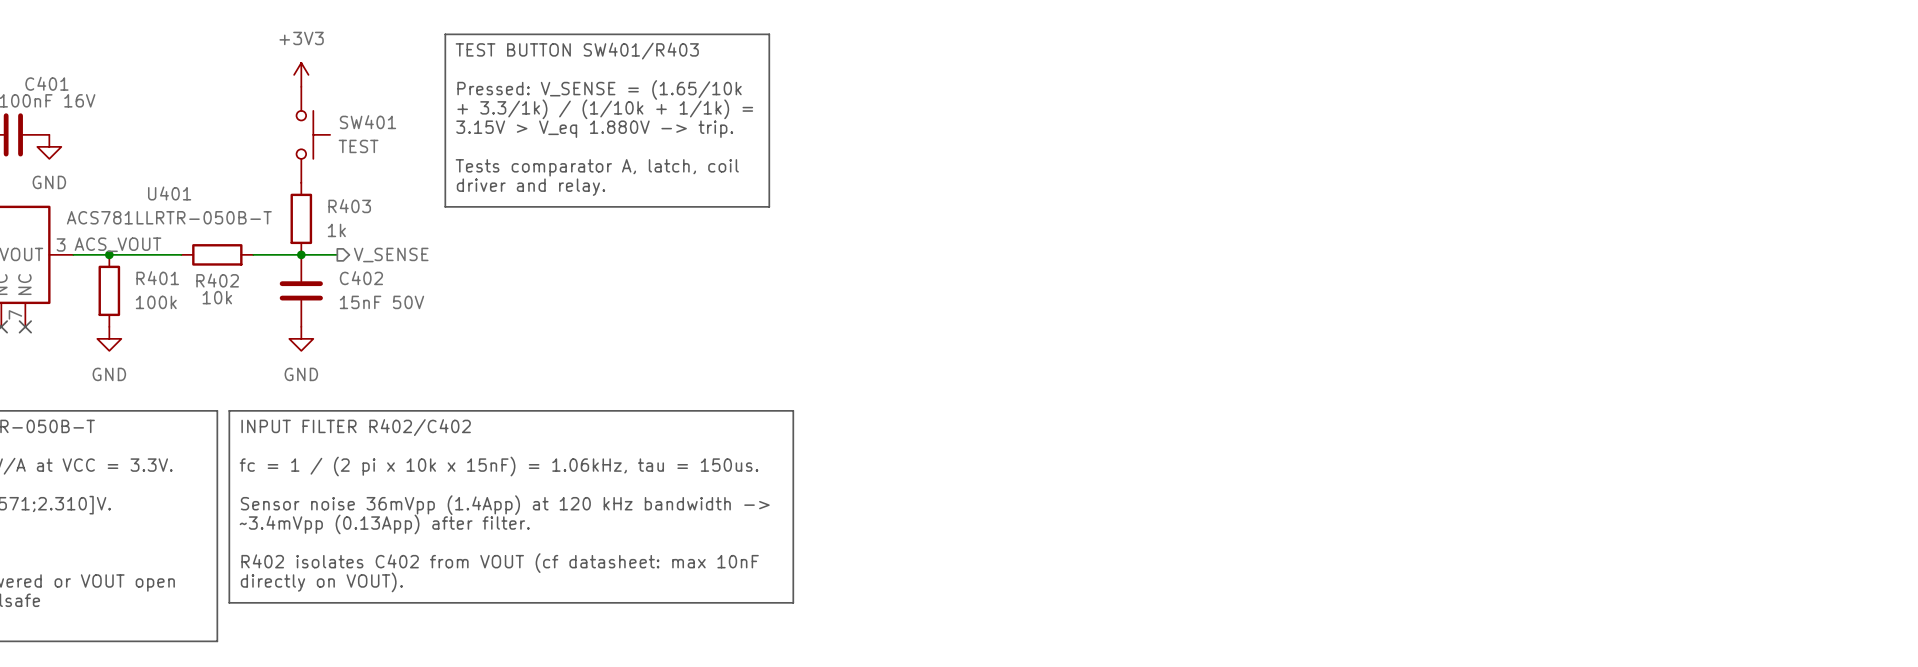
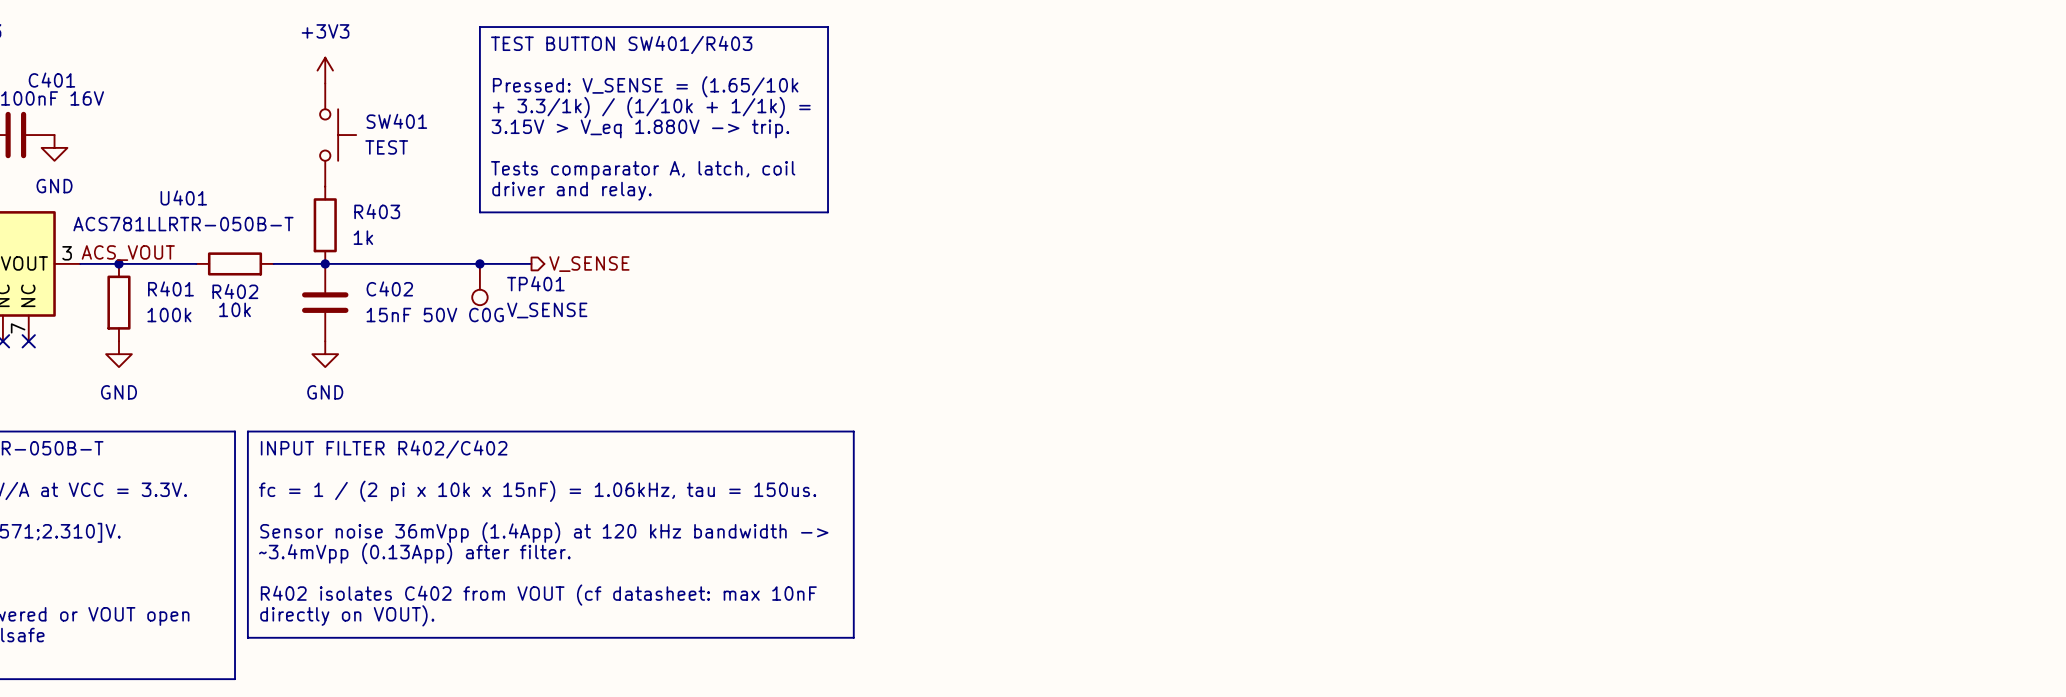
wire: none -> (363, 263) (531, 263)
junction: none -> (479, 263)
hierarchical label position: V_SENSE (391, 255) -> V_SENSE (589, 264)
TP401: none -> V_SENSE (479, 284)
C402 value: 15nF 50V (381, 302) -> 15nF 50V C0G (435, 315)

